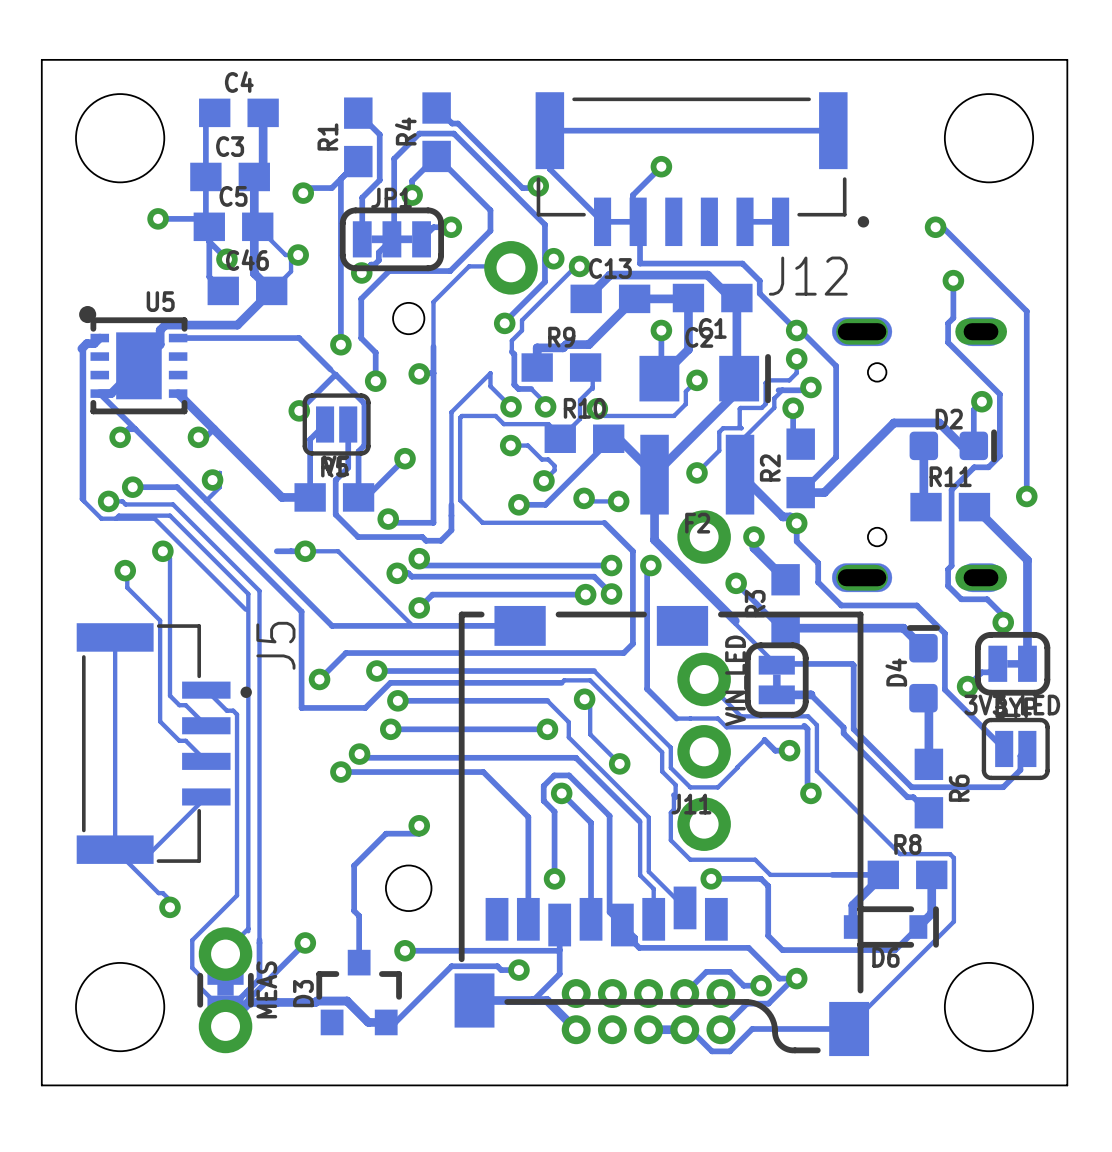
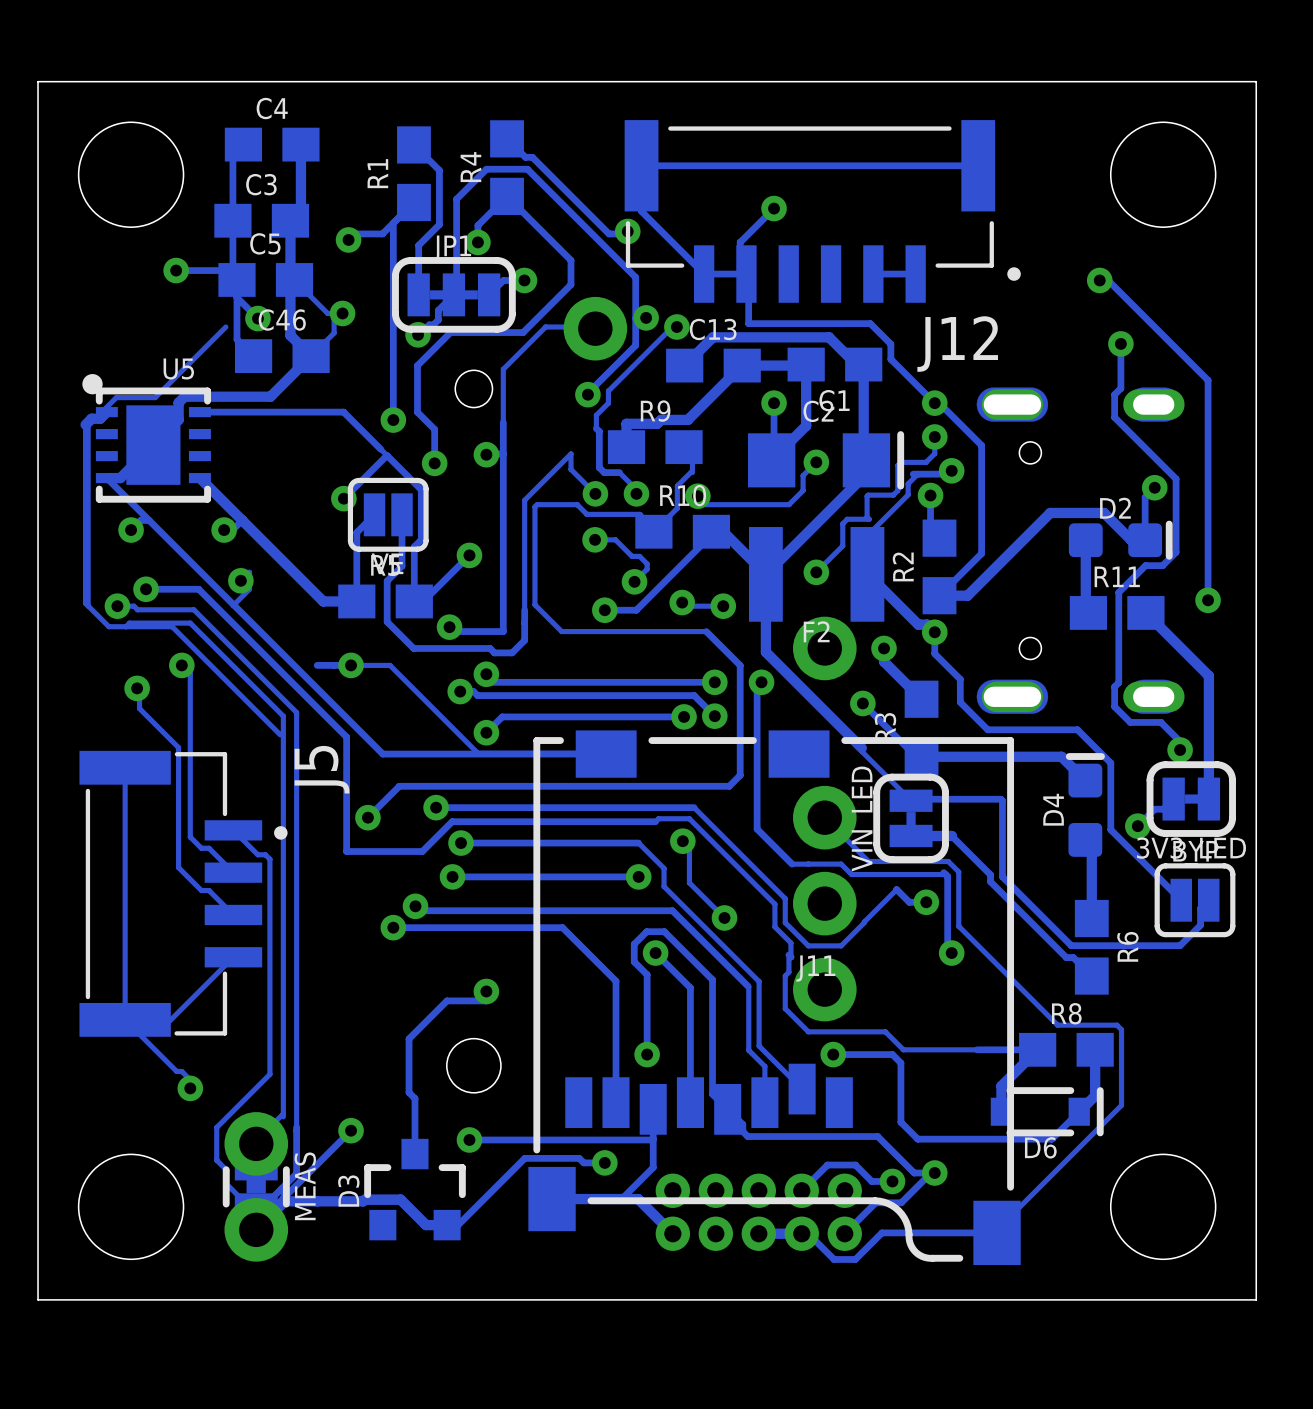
track: none -> (225, 327) (155, 397) (116, 397) (88, 425)

